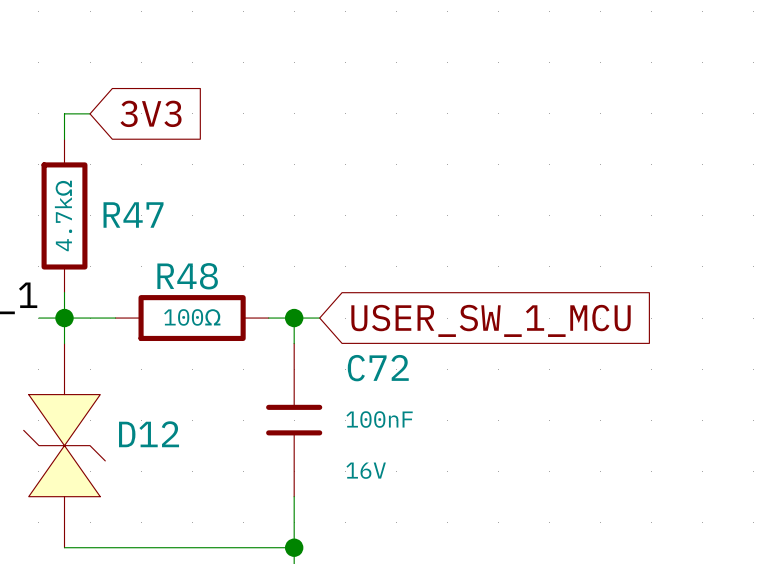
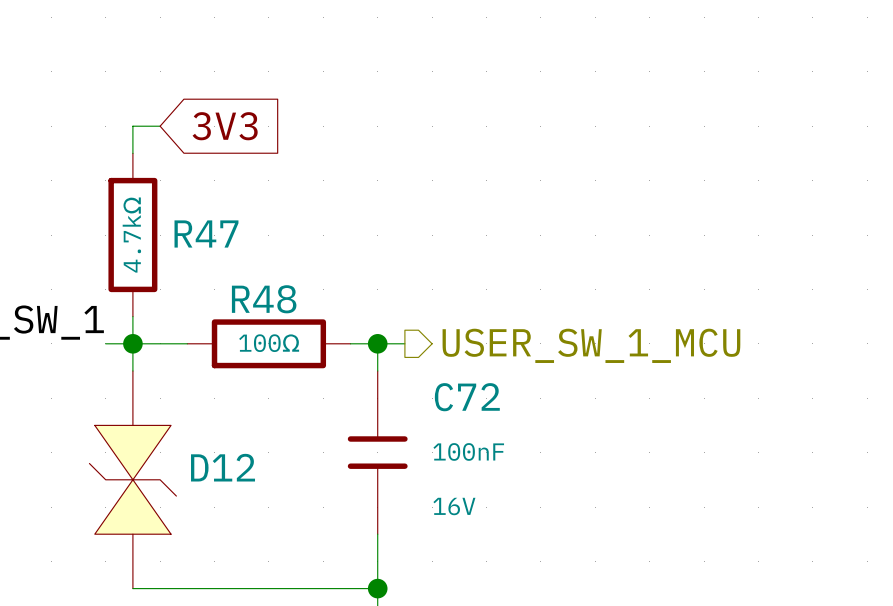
hierarchical label: none -> USER_SW_1_MCU (591, 345)
global label: USER_SW_1_MCU (491, 320) -> none

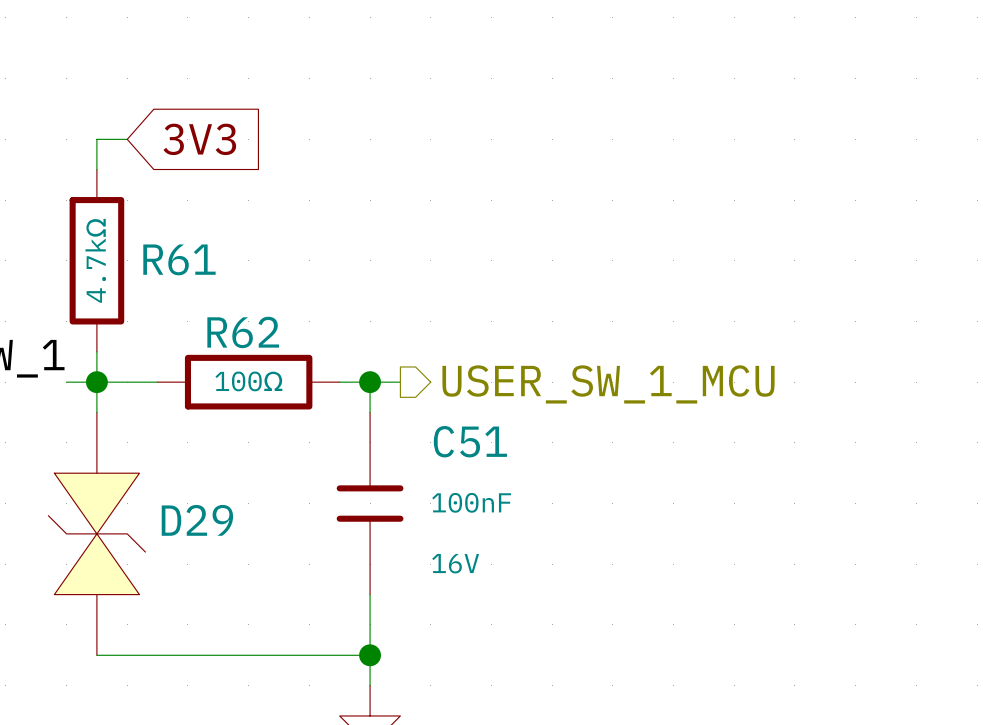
R47 name: R47 (206, 233) -> R61 (179, 259)
R48 name: R48 (264, 299) -> R62 (243, 332)
C72 name: C72 (467, 397) -> C51 (470, 441)
D12 name: D12 (223, 467) -> D29 (197, 520)

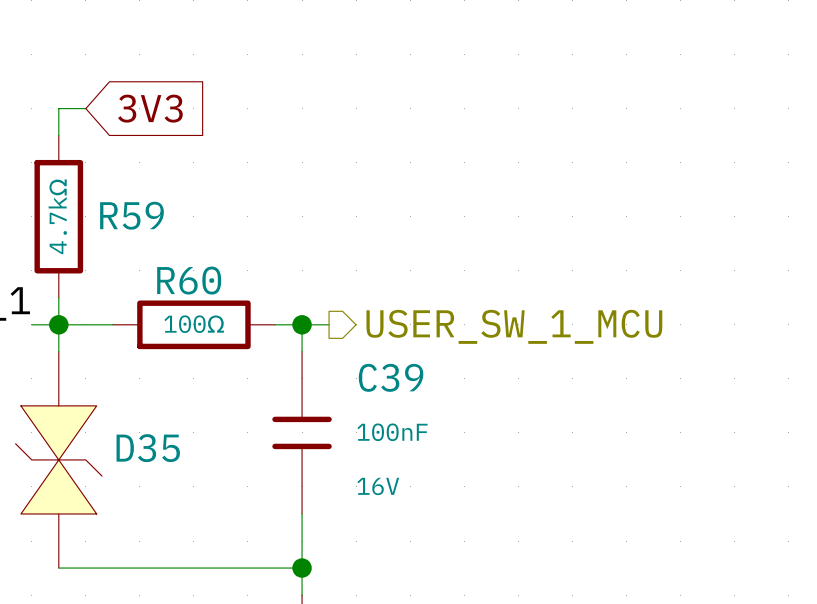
R61 name: R61 (179, 259) -> R59 (131, 215)
R62 name: R62 (243, 332) -> R60 (189, 280)
C51 name: C51 (470, 441) -> C39 (391, 377)
D29 name: D29 (197, 520) -> D35 (148, 448)

